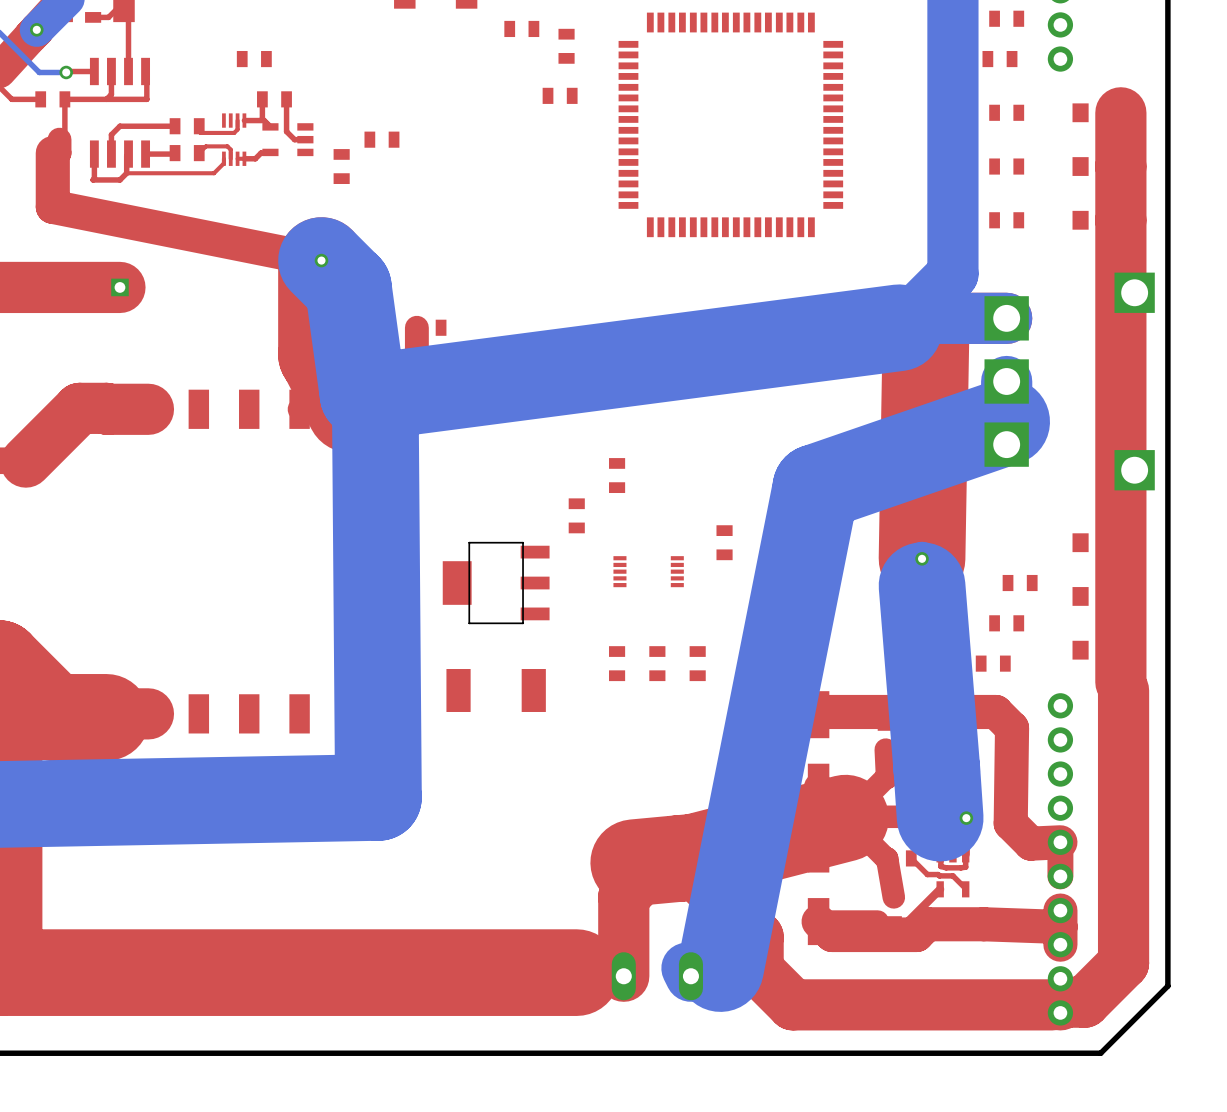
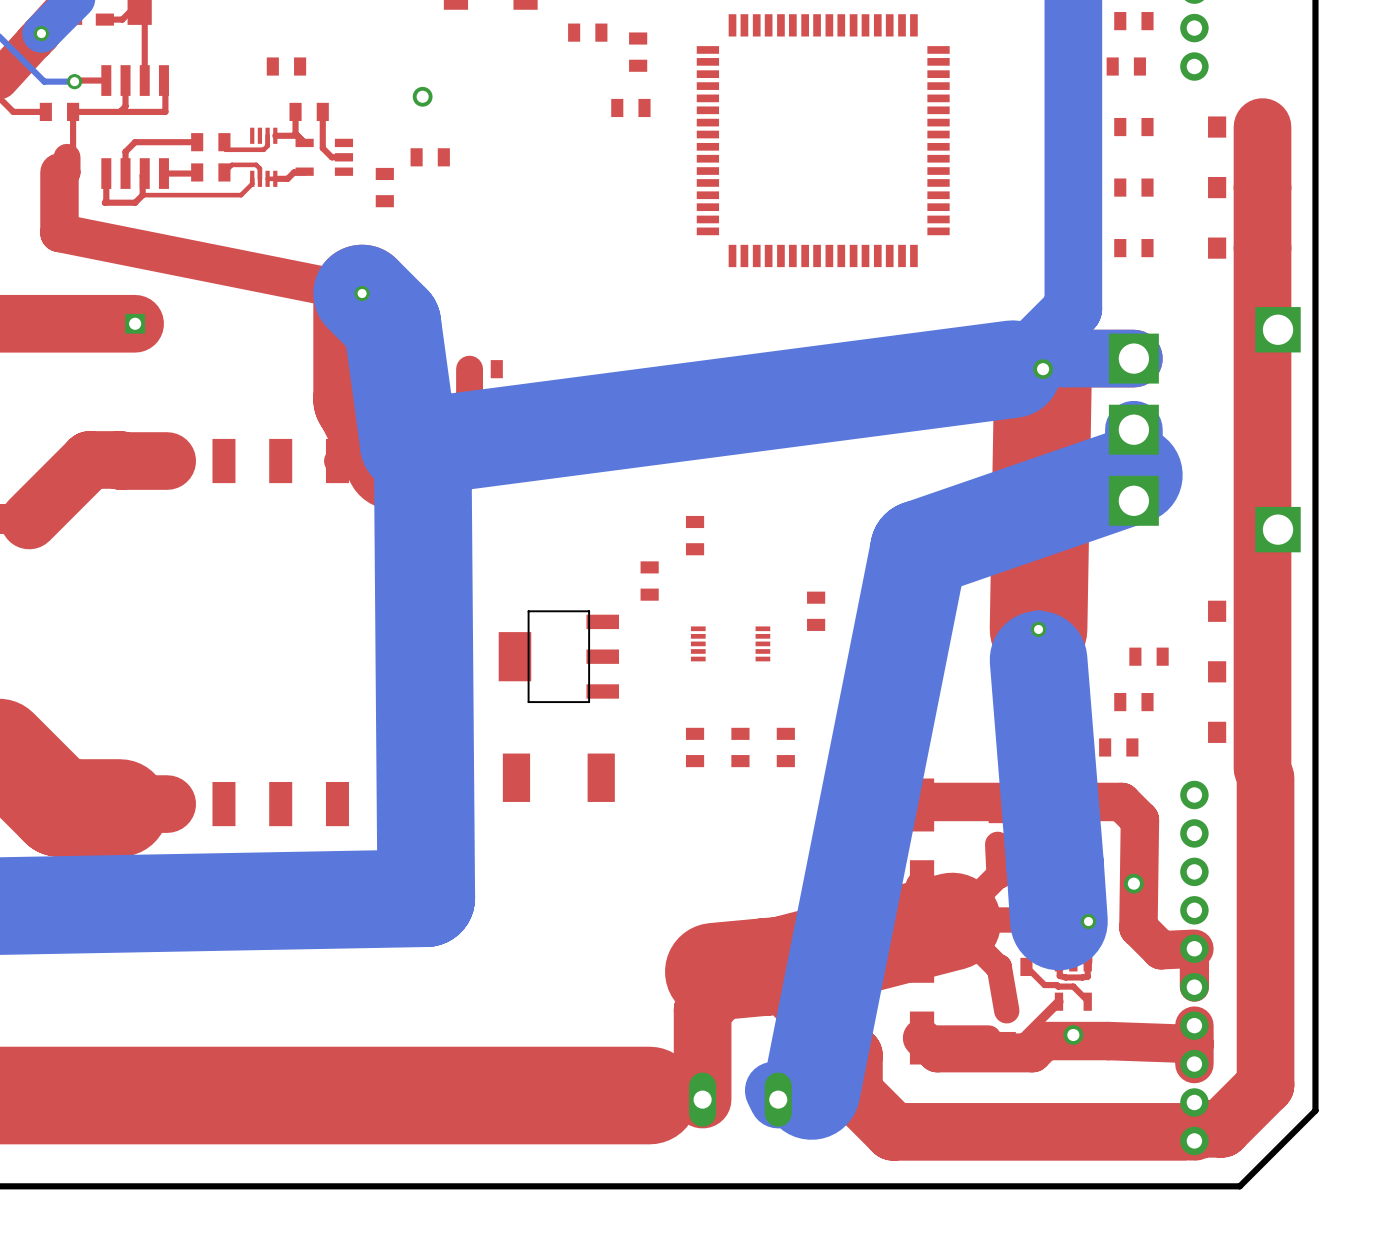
part: none -> (422, 96)
part: none -> (1043, 369)
part: none -> (1133, 883)
part: none -> (1073, 1035)

